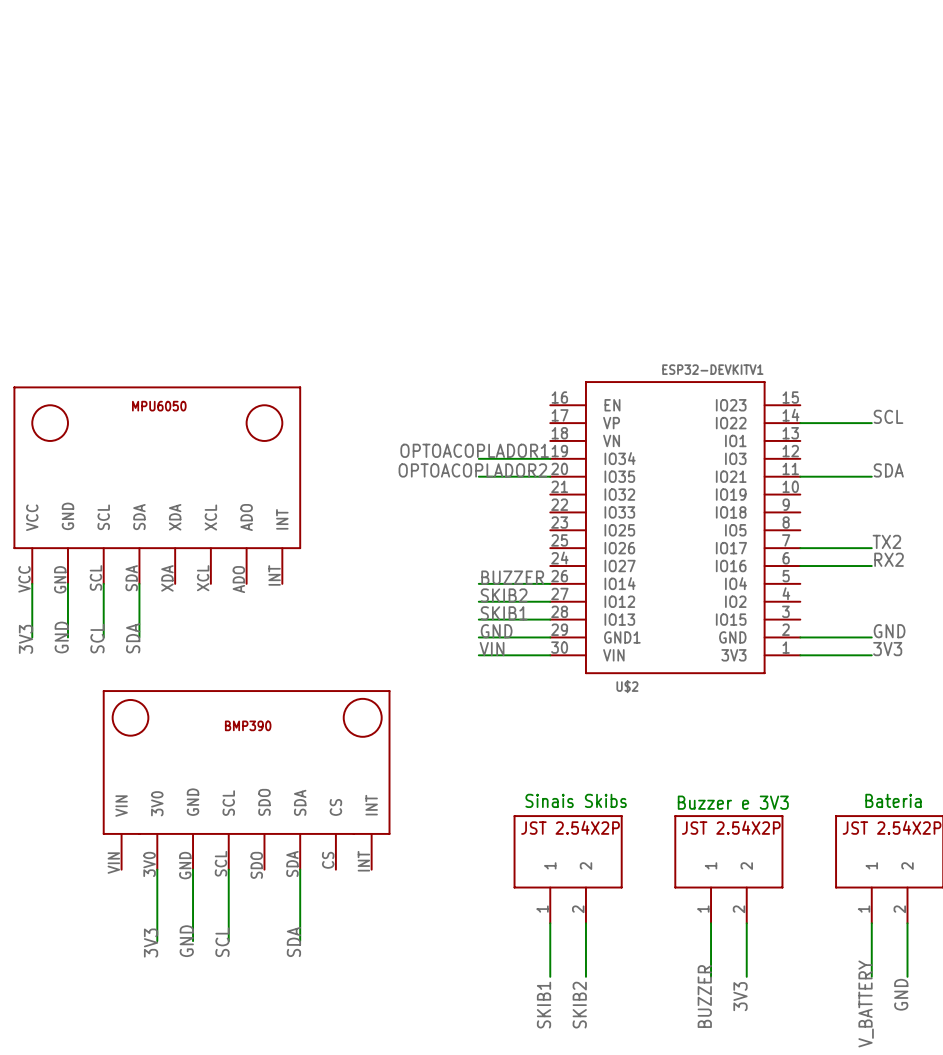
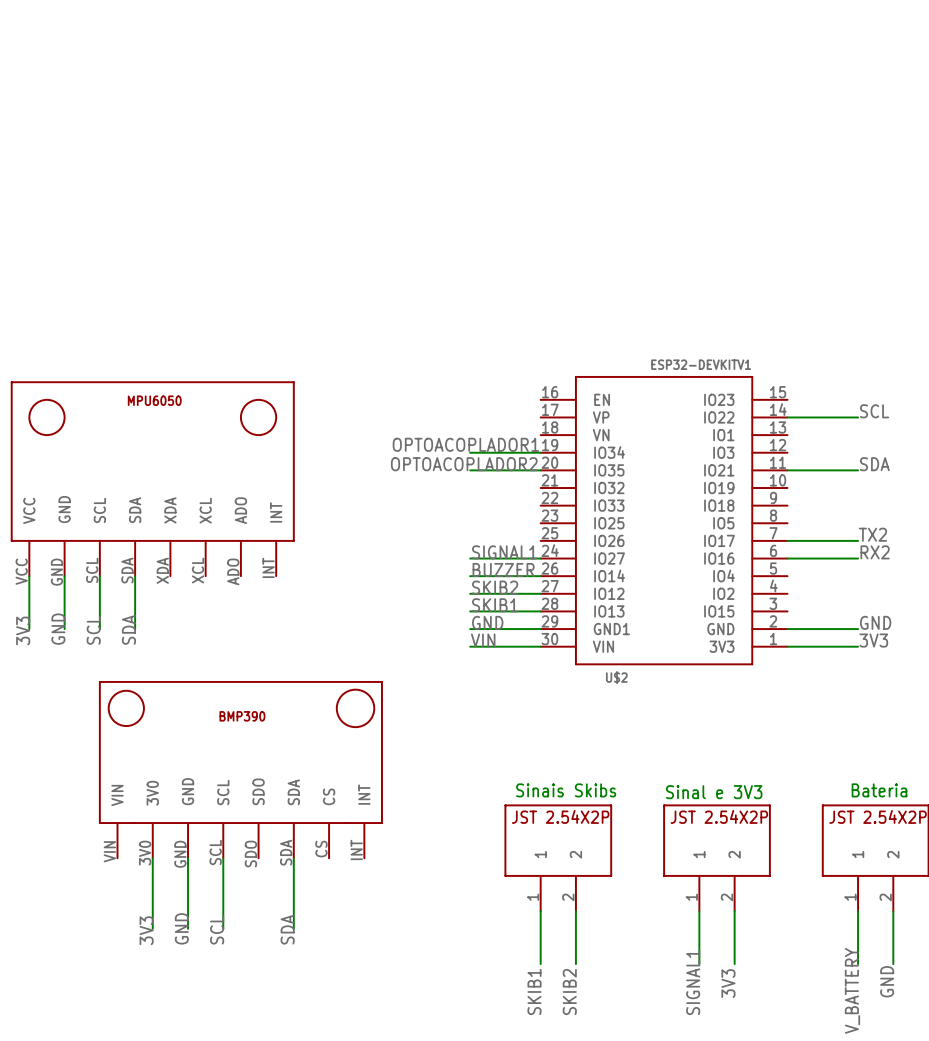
label: none -> SIGNAL1 (504, 552)
wire: none -> (470, 558) (540, 558)
text: Buzzer e 3V3 (733, 802) -> Sinal e 3V3 (714, 792)
label: BUZZER (704, 996) -> SIGNAL1 (693, 982)

